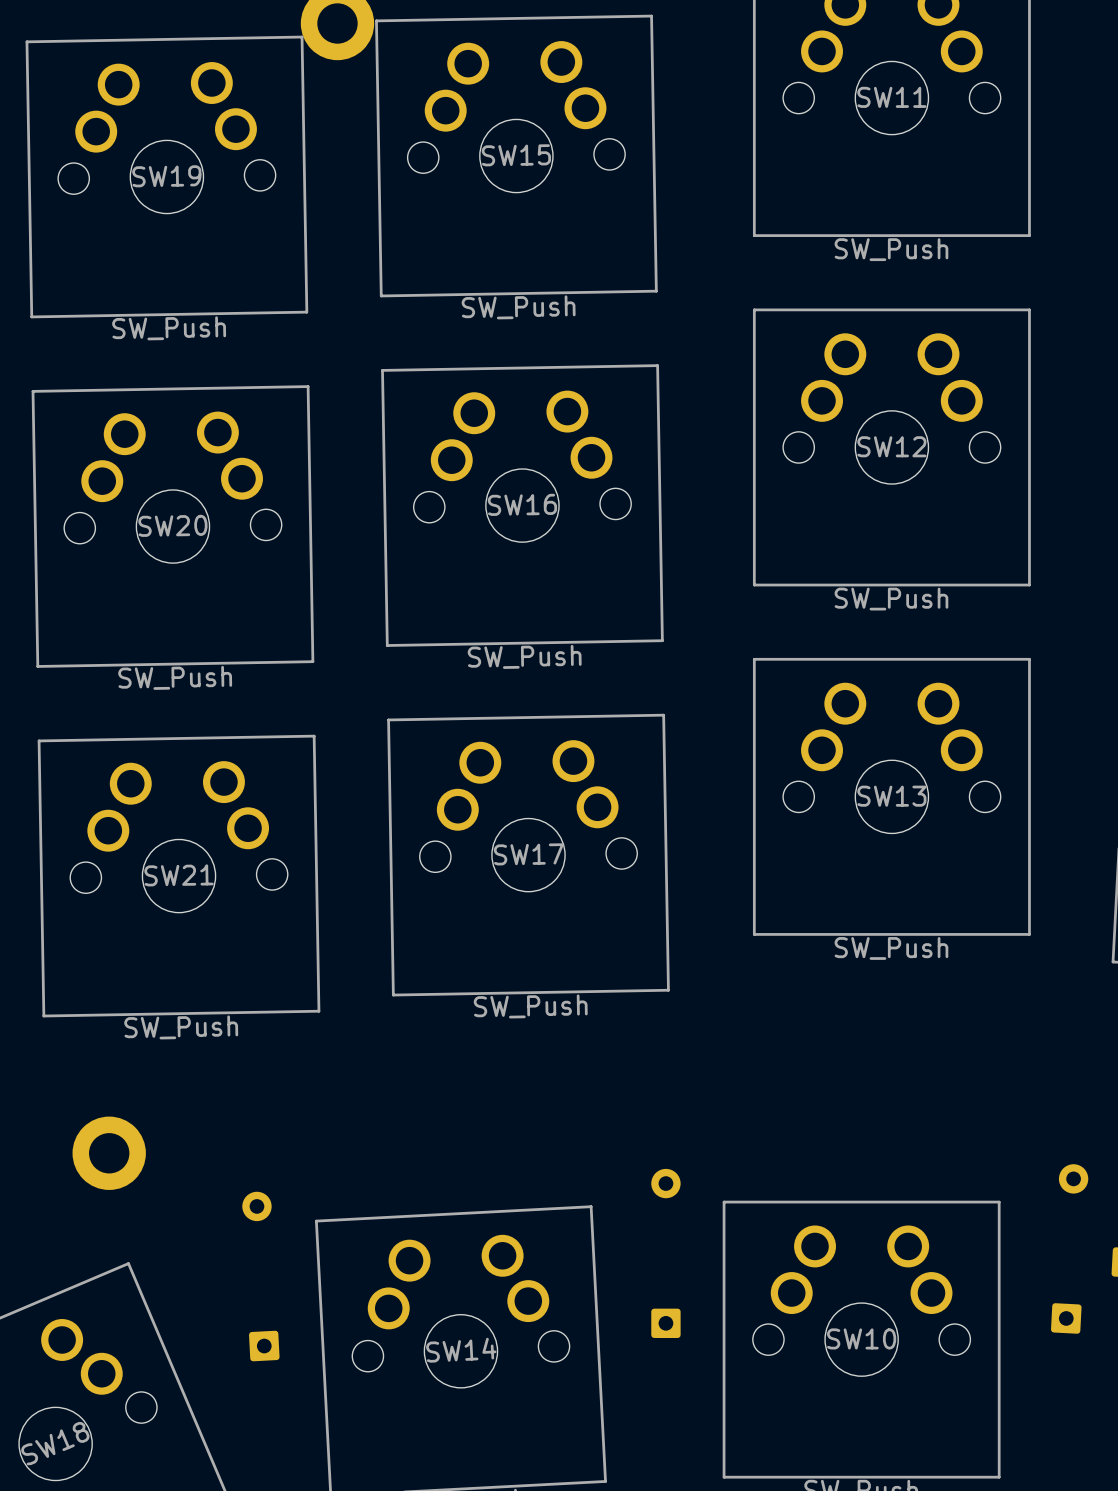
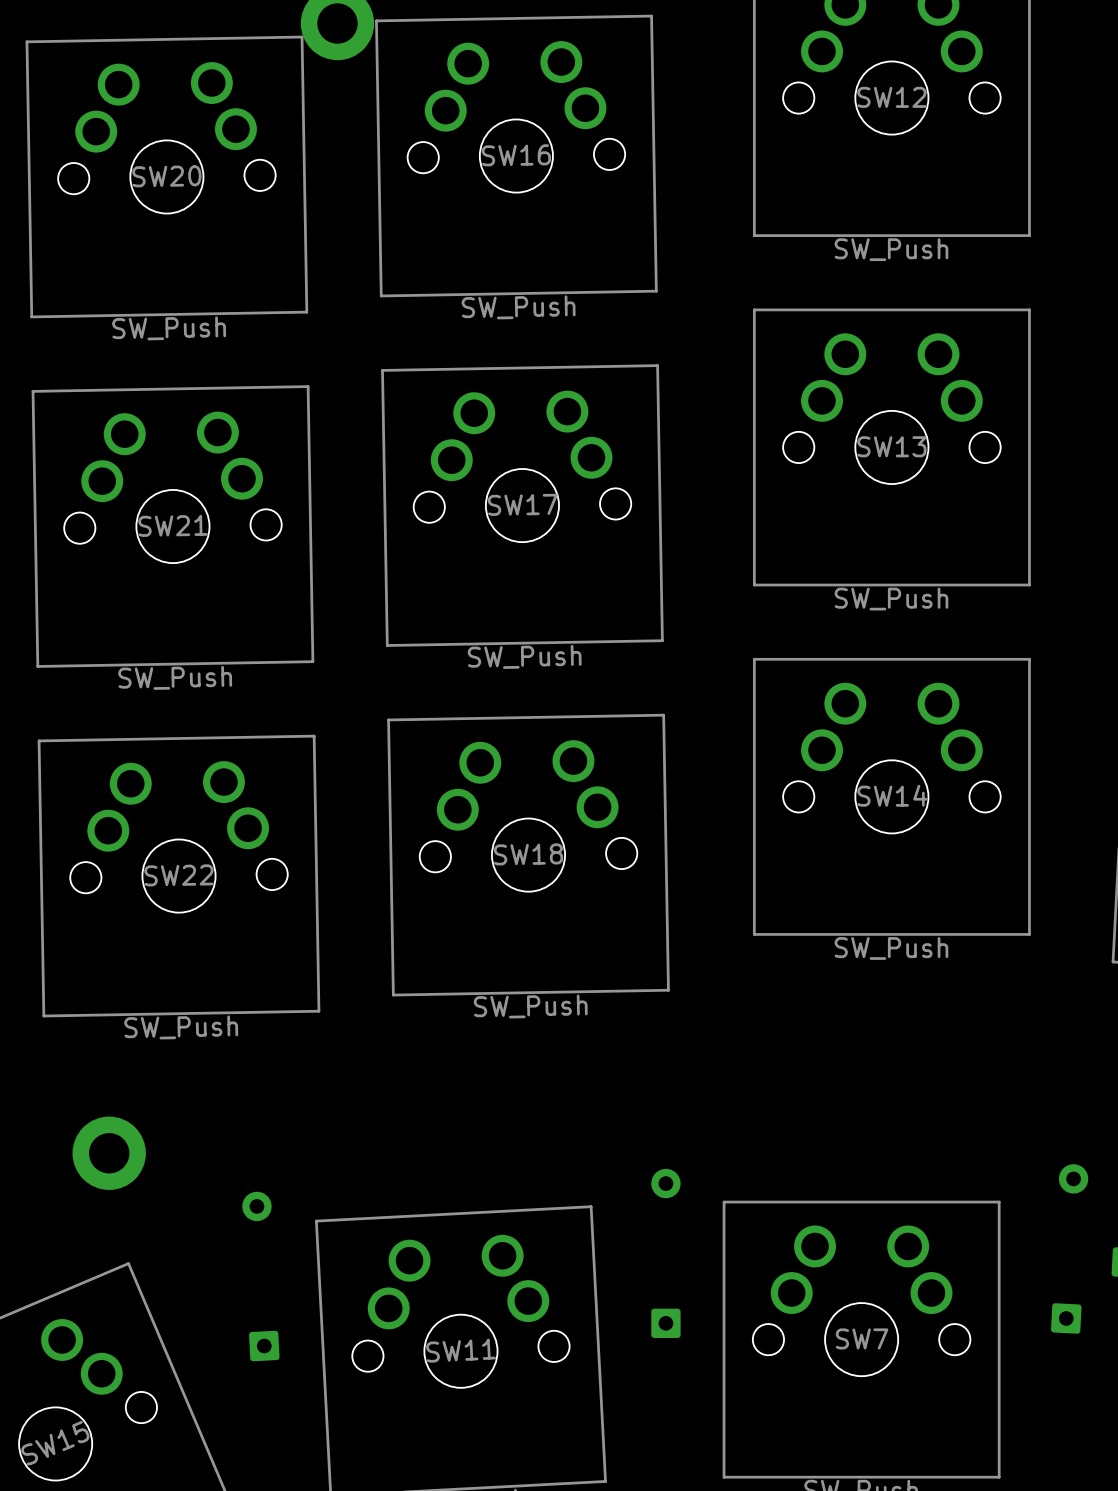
SW11 name: SW11 (891, 97) -> SW12 (891, 97)
SW15 name: SW15 (516, 155) -> SW16 (516, 155)
SW19 name: SW19 (166, 176) -> SW20 (166, 176)
SW12 name: SW12 (891, 446) -> SW13 (891, 446)
SW16 name: SW16 (522, 504) -> SW17 (522, 504)
SW20 name: SW20 (172, 525) -> SW21 (172, 525)
SW13 name: SW13 (891, 796) -> SW14 (892, 795)
SW17 name: SW17 (528, 854) -> SW18 (528, 854)
SW21 name: SW21 (179, 875) -> SW22 (179, 875)
SW10 name: SW10 (861, 1338) -> SW7 (862, 1338)
SW14 name: SW14 (461, 1350) -> SW11 (461, 1350)
SW18 name: SW18 (55, 1443) -> SW15 (55, 1443)

